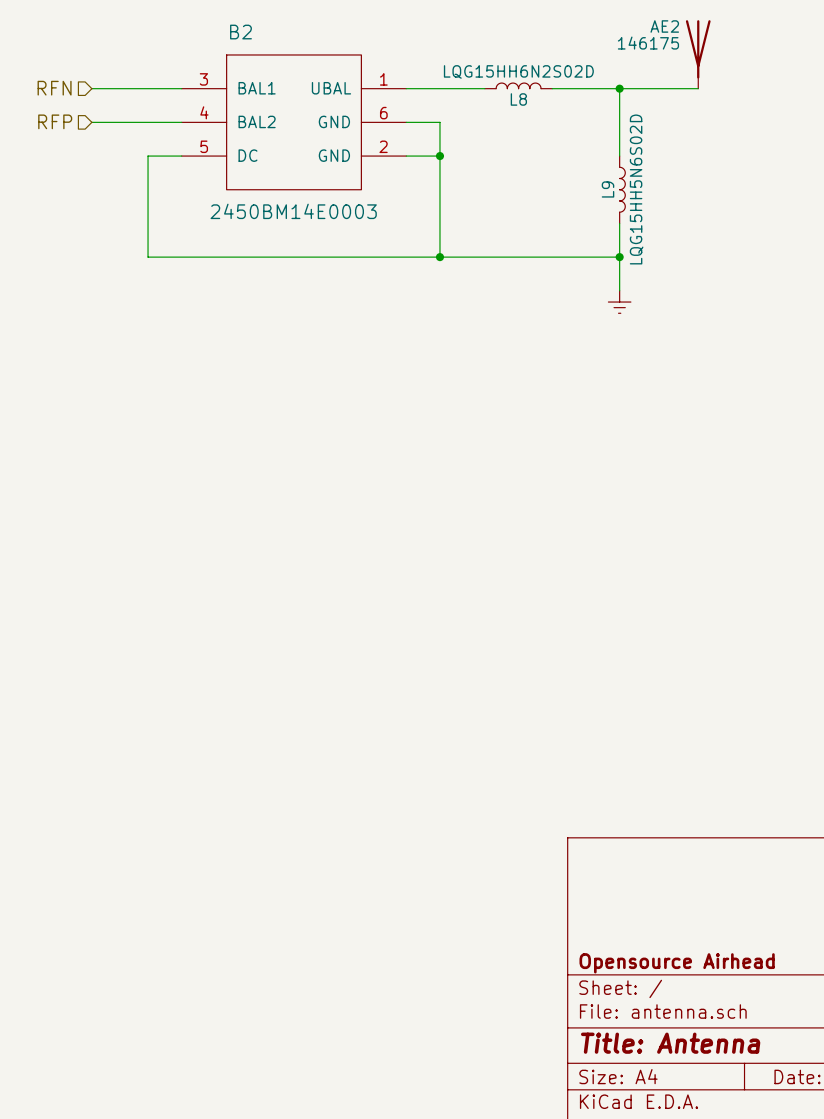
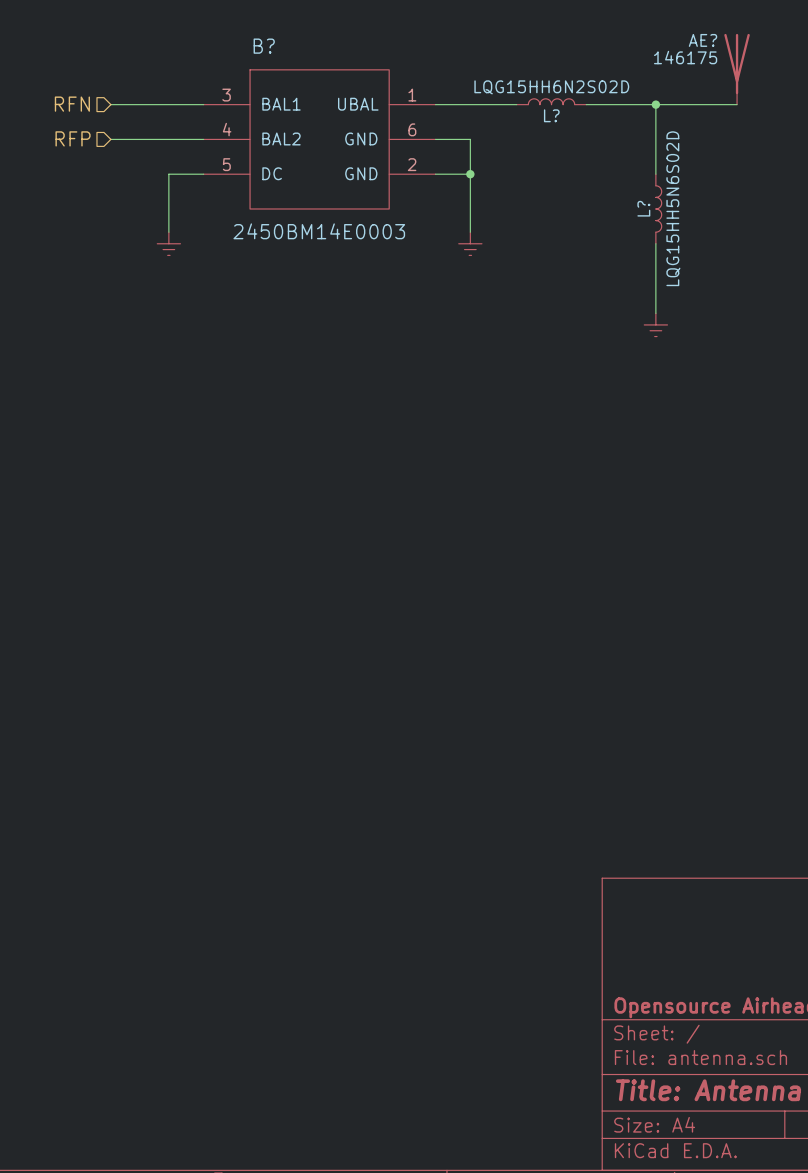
AE2 name: AE2 (664, 26) -> AE? (703, 40)
B2 name: B2 (240, 32) -> B? (264, 46)
L8 name: L8 (518, 99) -> L? (551, 115)
L9 name: L9 (608, 189) -> L? (643, 208)
wire: (148, 212) (148, 257) (619, 257) -> none
wire: (439, 212) (439, 257) -> none
power symbol: none -> (168, 243)
power symbol: none -> (470, 243)
junction: (439, 257) -> none
junction: (619, 257) -> none

